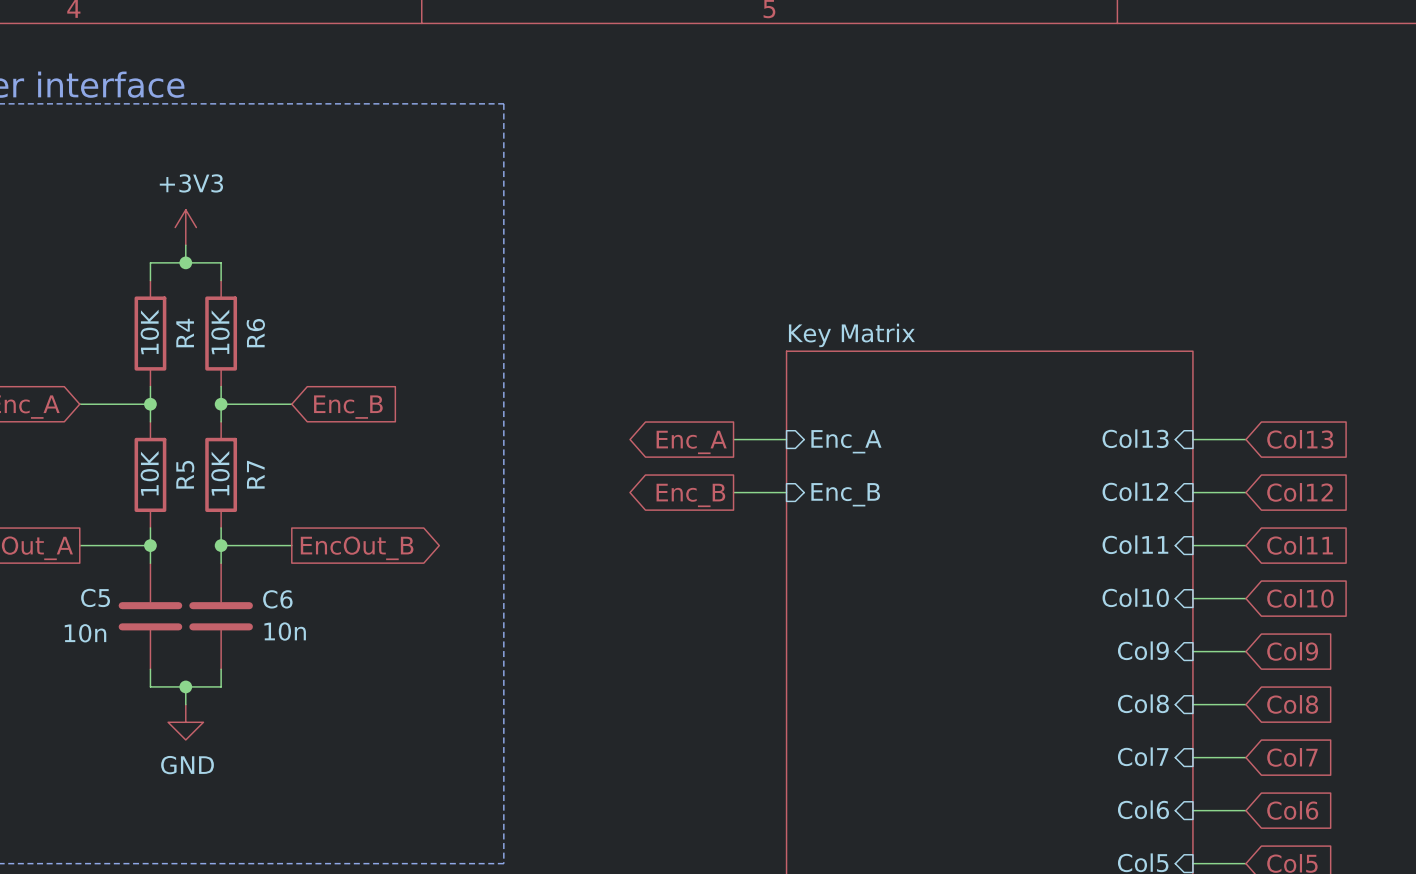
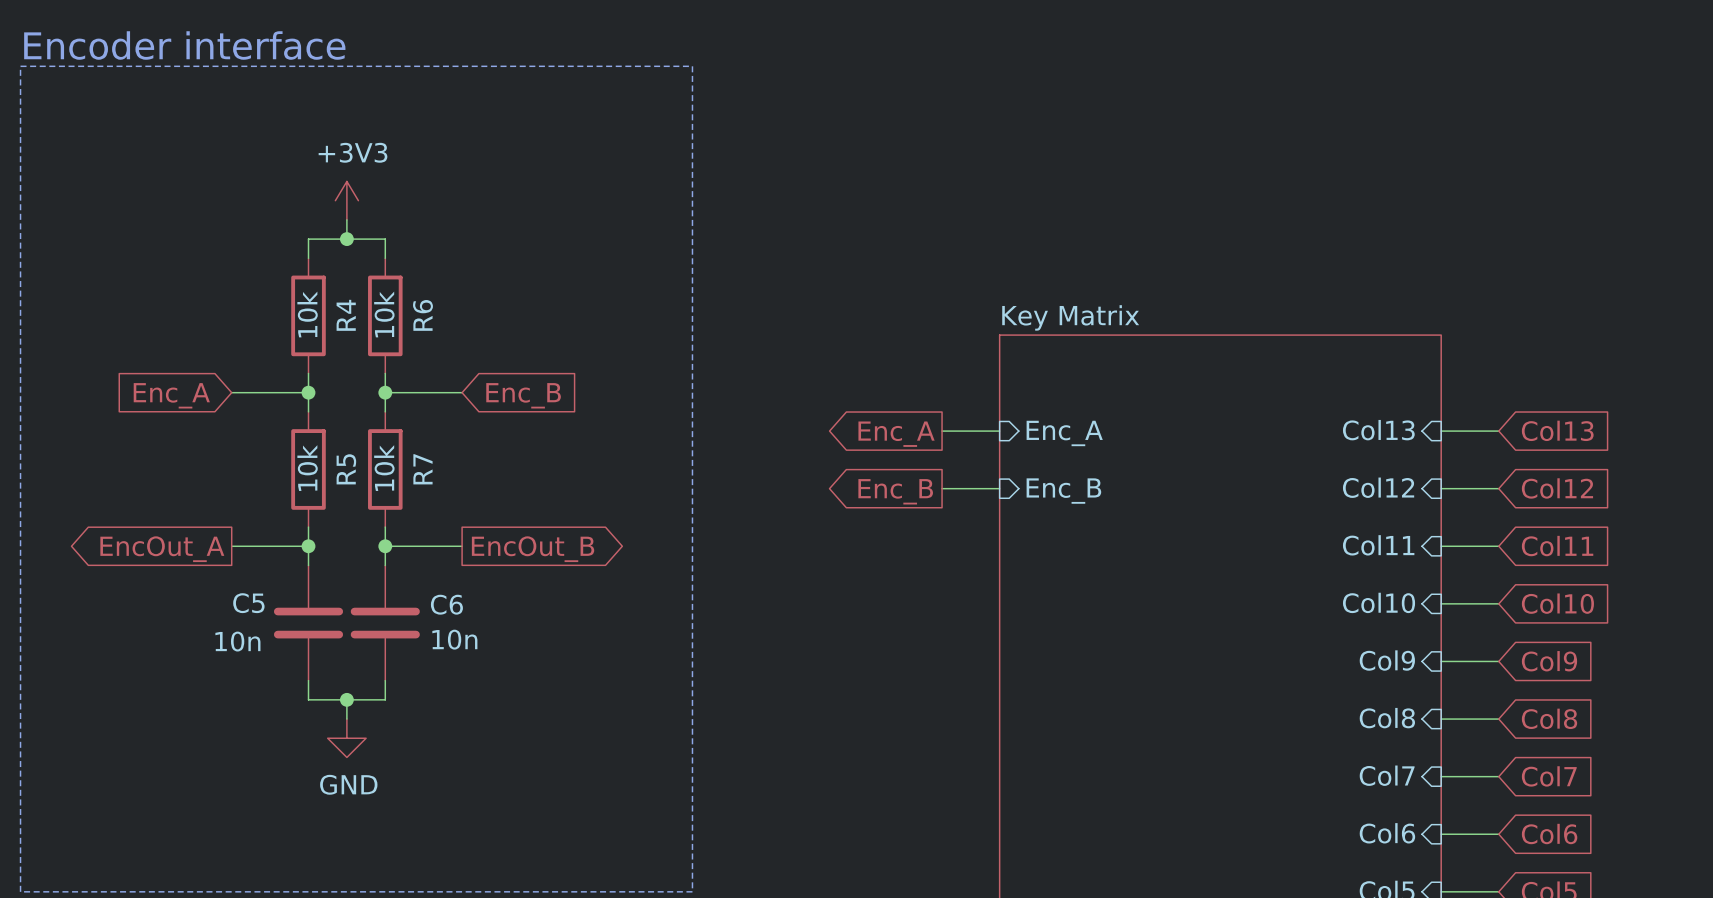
R4 value: 10K (149, 331) -> 10k (307, 314)
R6 value: 10K (220, 331) -> 10k (384, 314)
R5 value: 10K (149, 473) -> 10k (307, 468)
R7 value: 10K (220, 473) -> 10k (384, 468)

